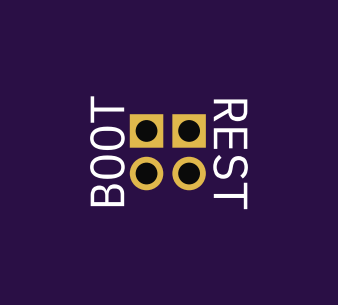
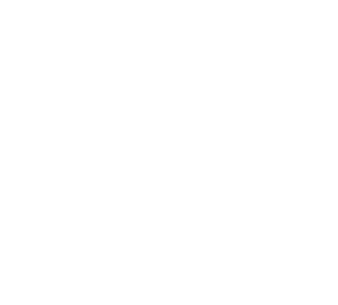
part: BOOT (146, 152) -> none
part: REST (189, 152) -> none

